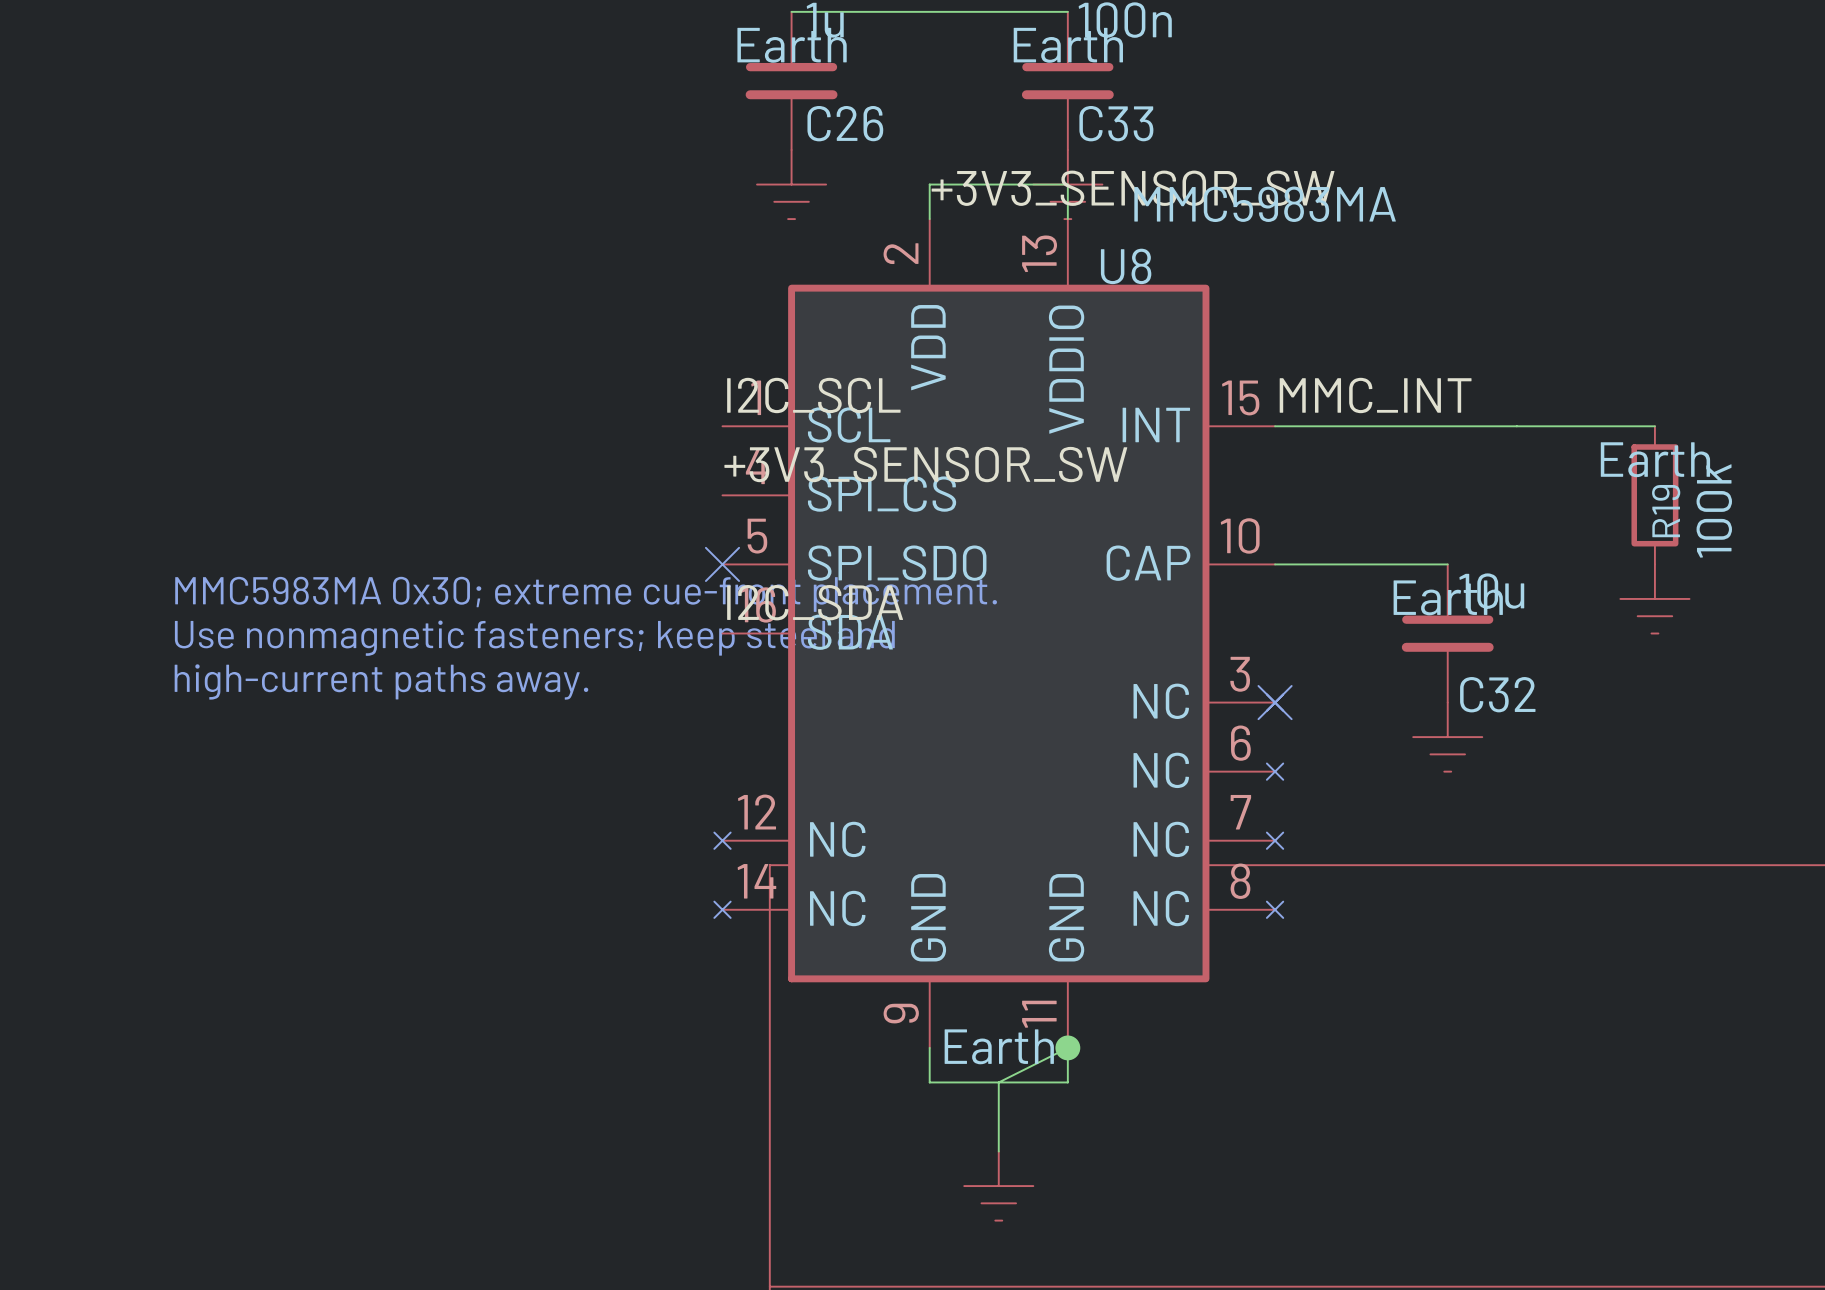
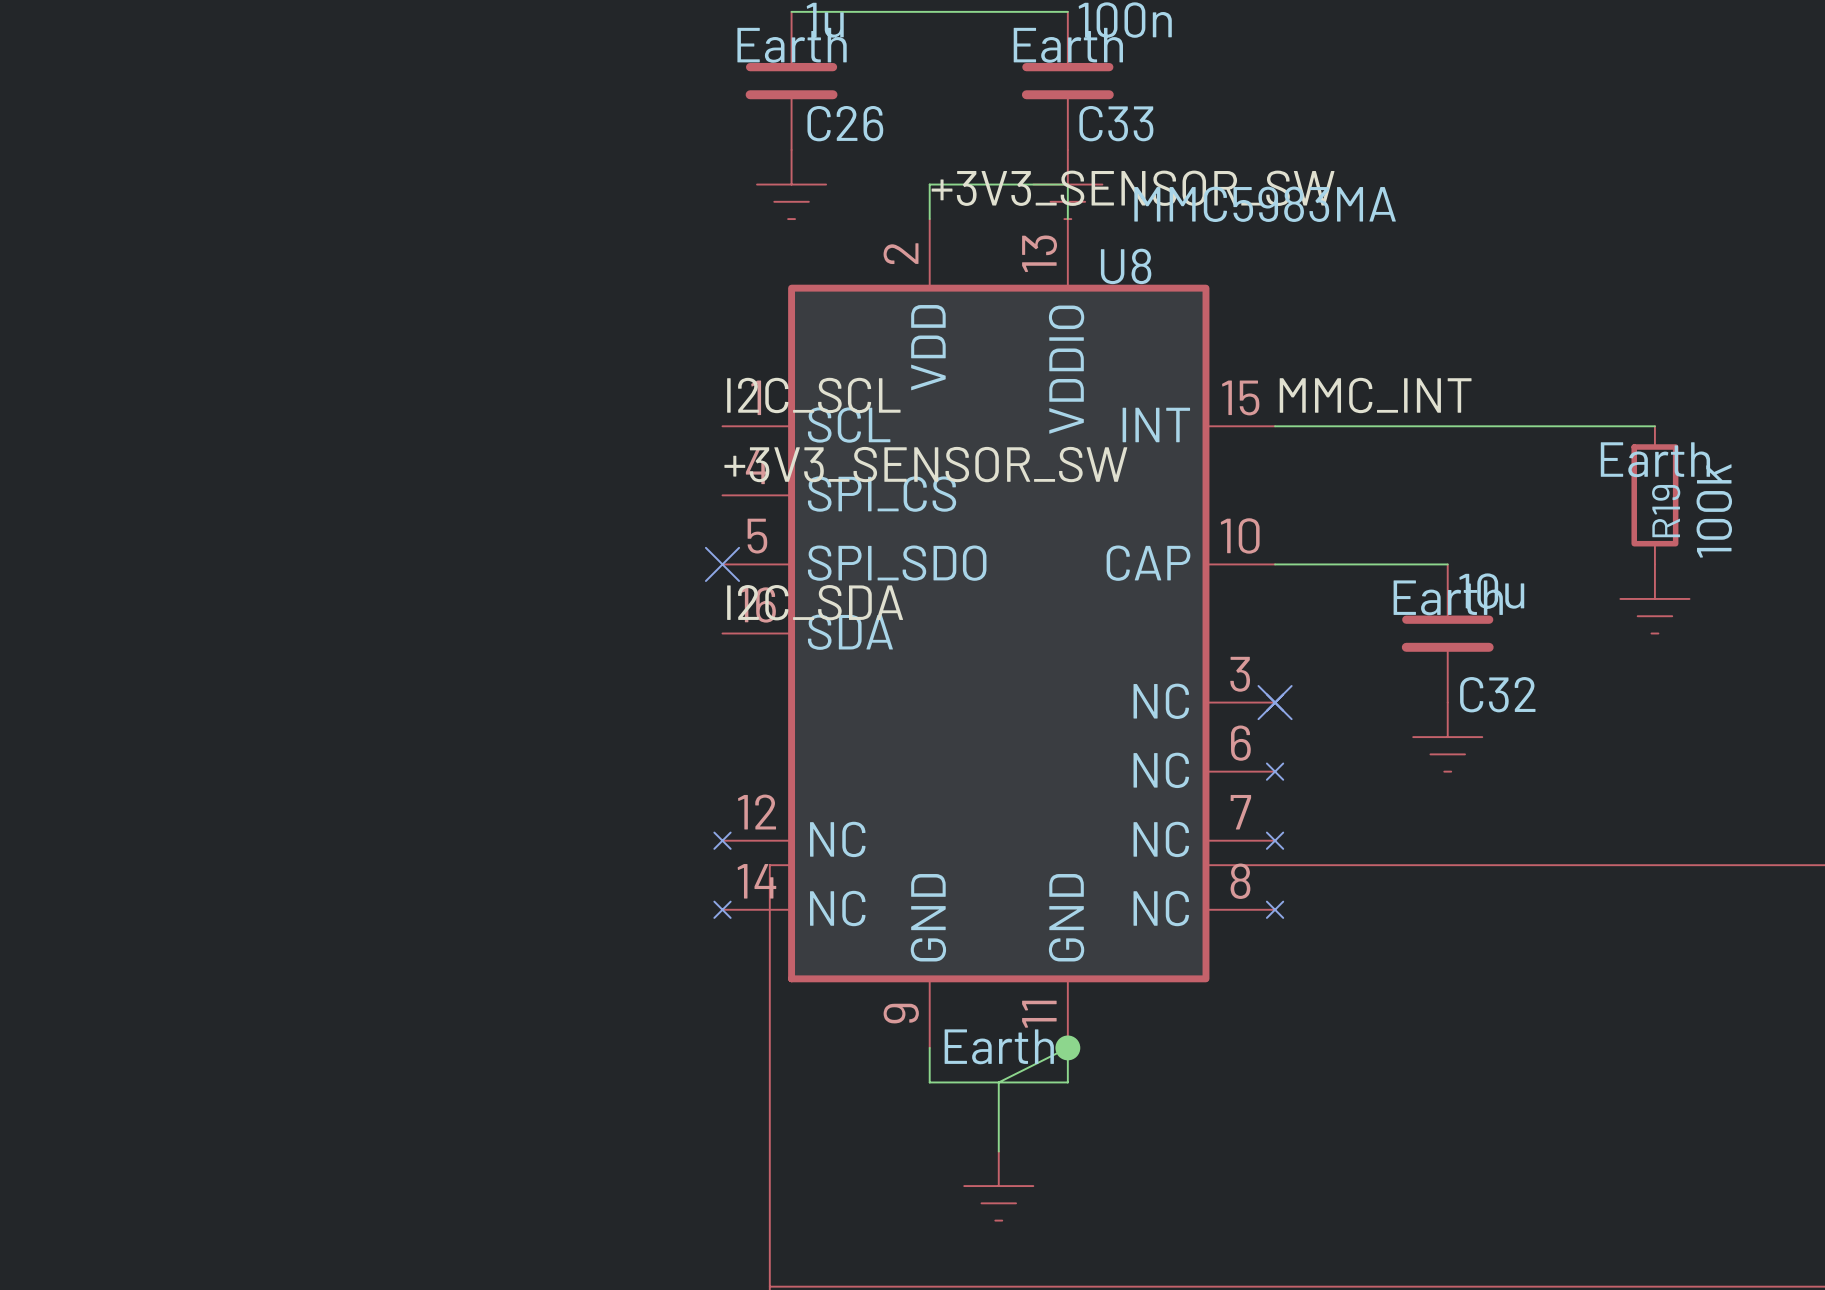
text: MMC5983MA 0x30; extreme cue-front placement. (586, 594) -> none
text: Use nonmagnetic fasteners; keep steel and (534, 638) -> none
text: high-current paths away. (381, 681) -> none

